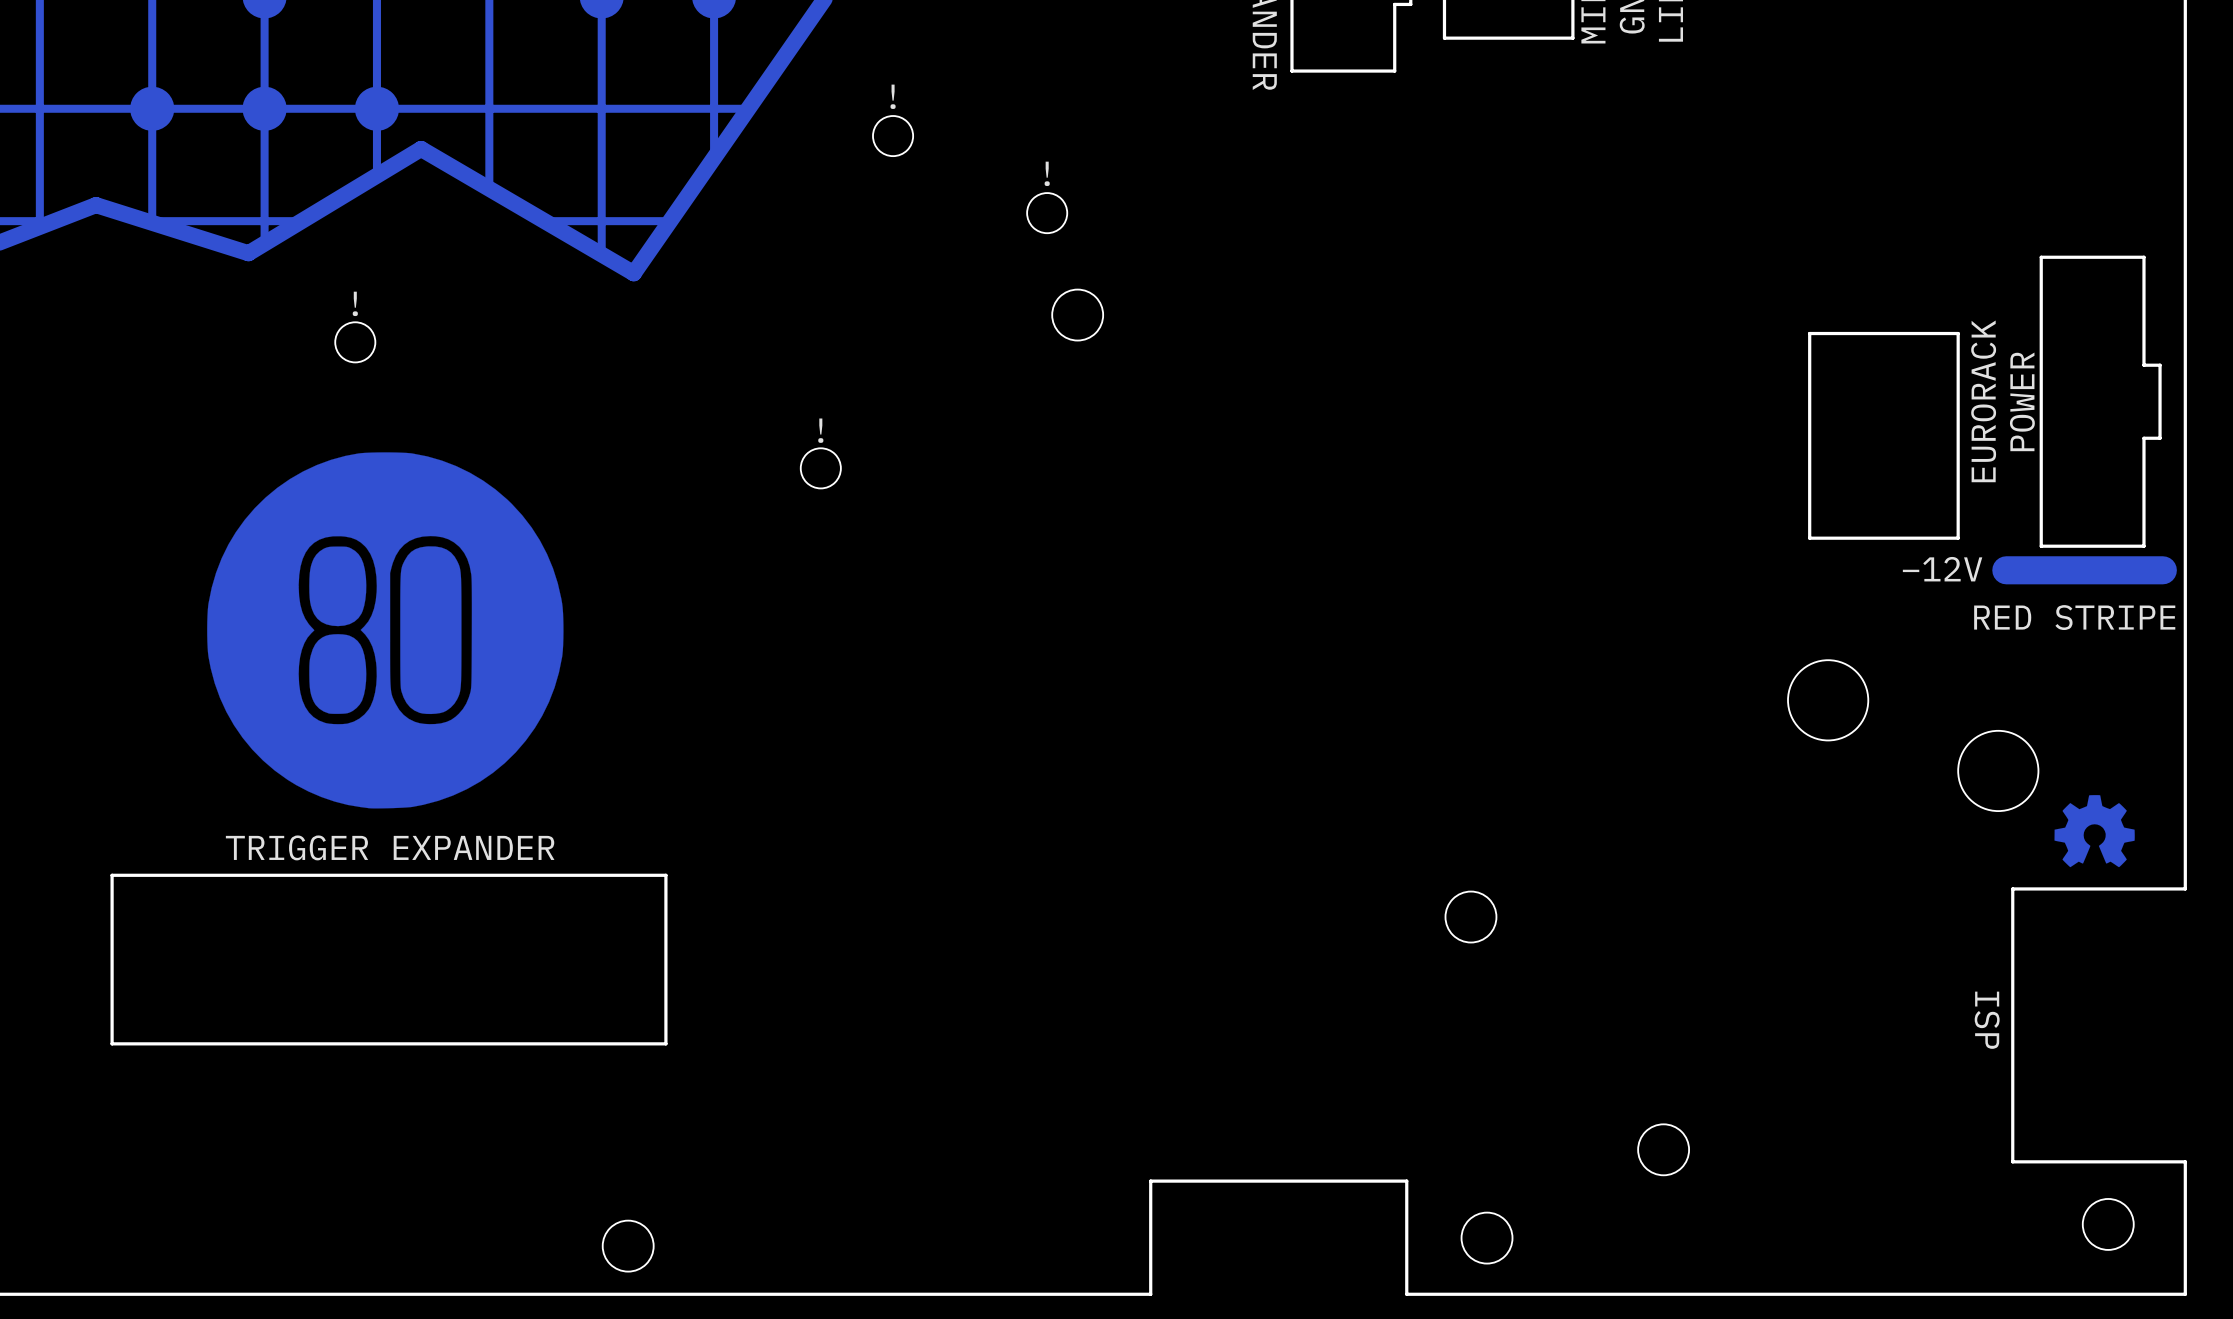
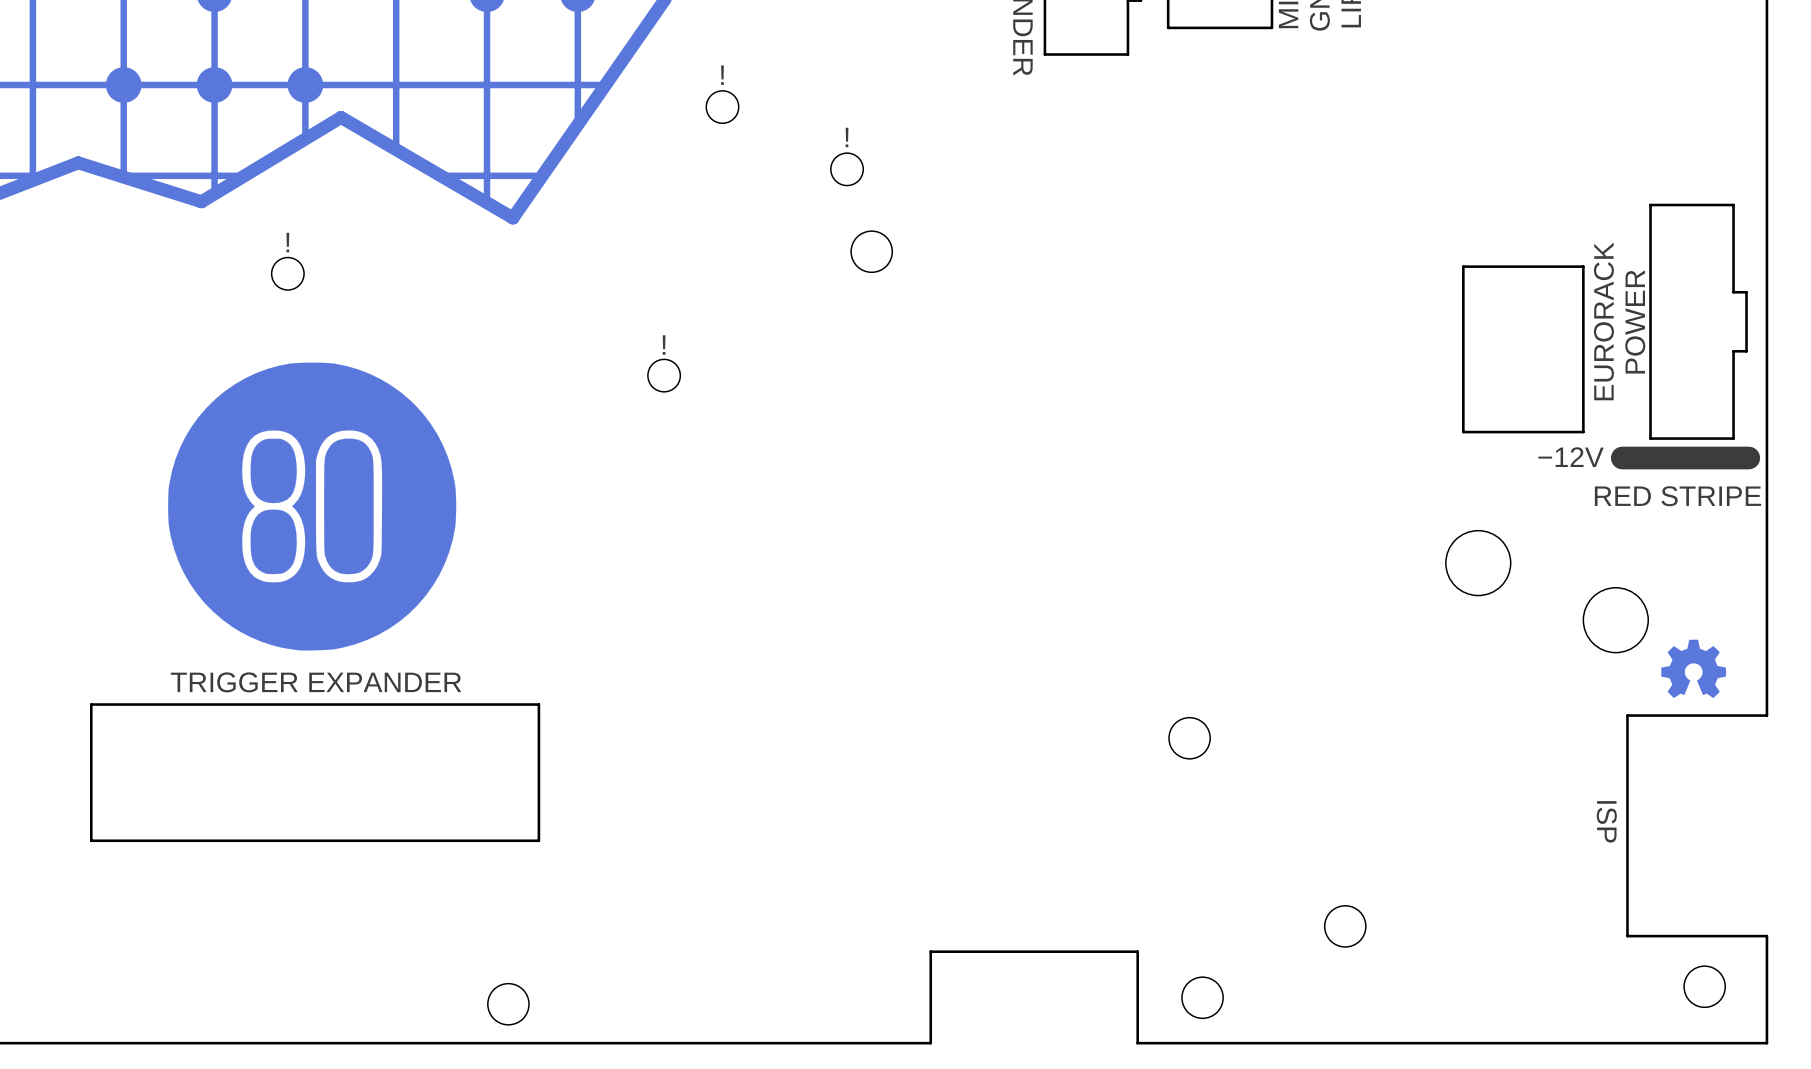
bottom track: (2162, 570) (2006, 570) -> none
line: none -> (1748, 458) (1622, 458)

